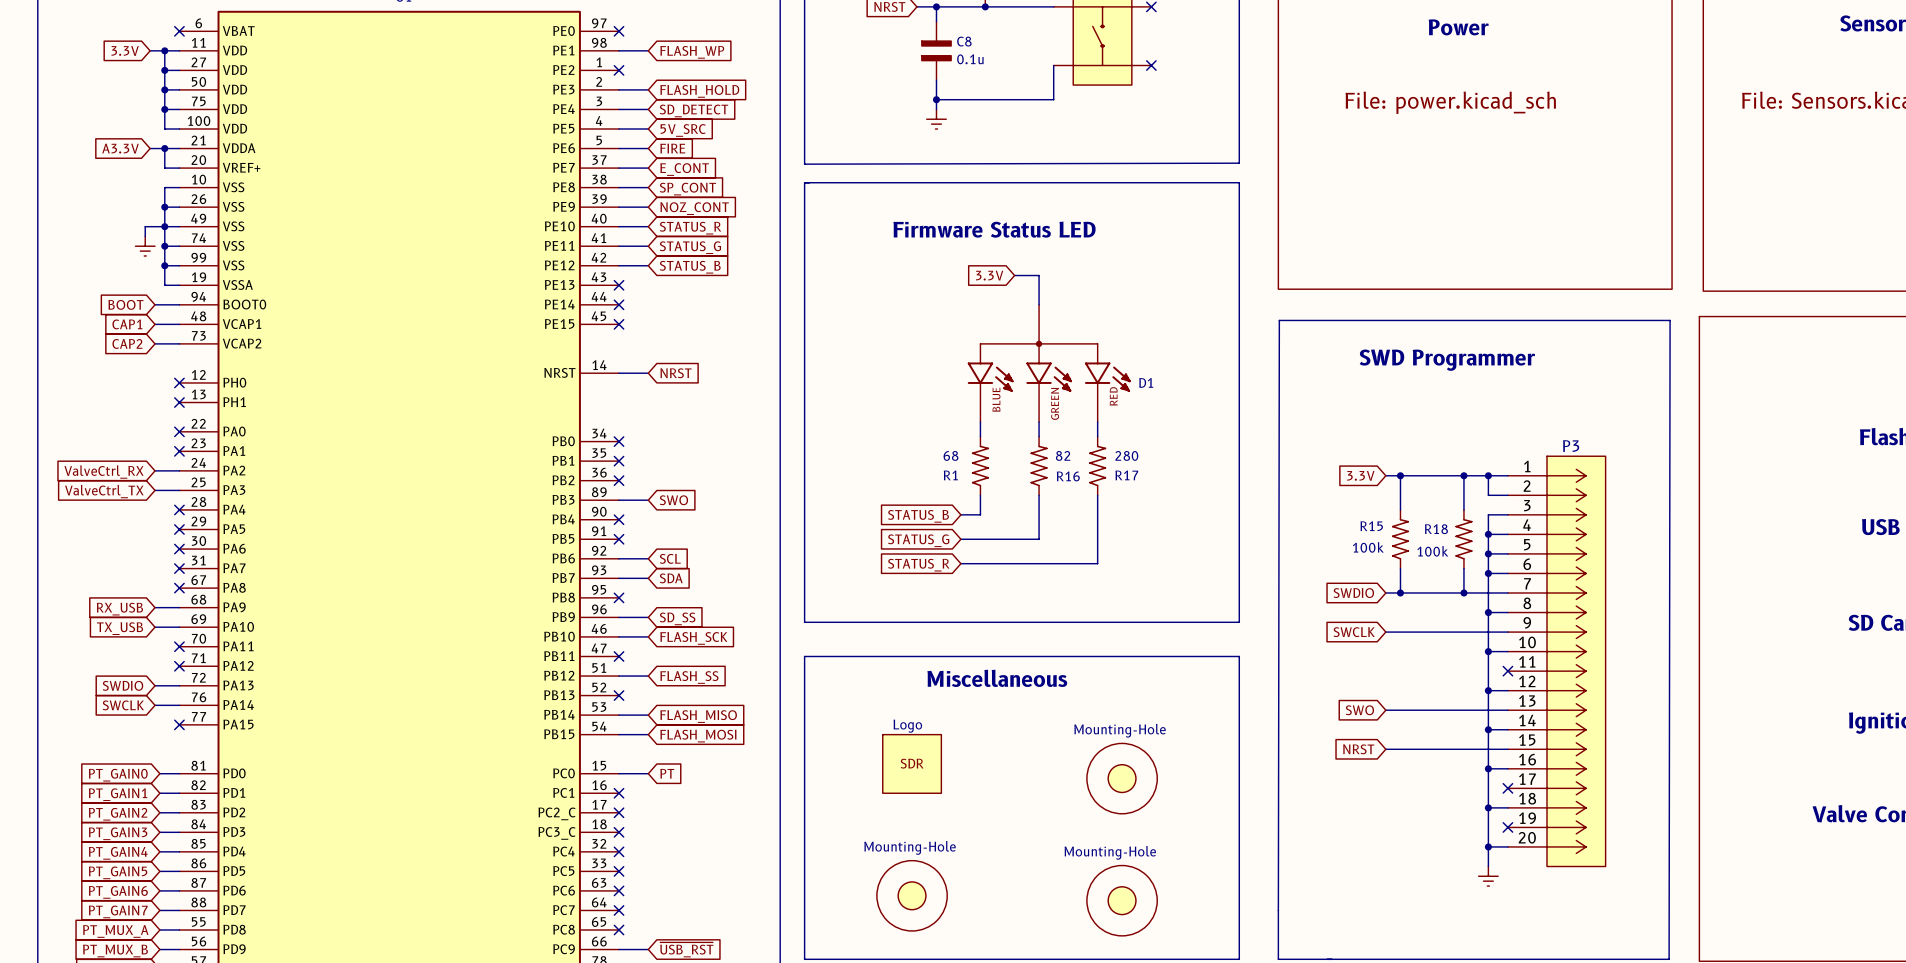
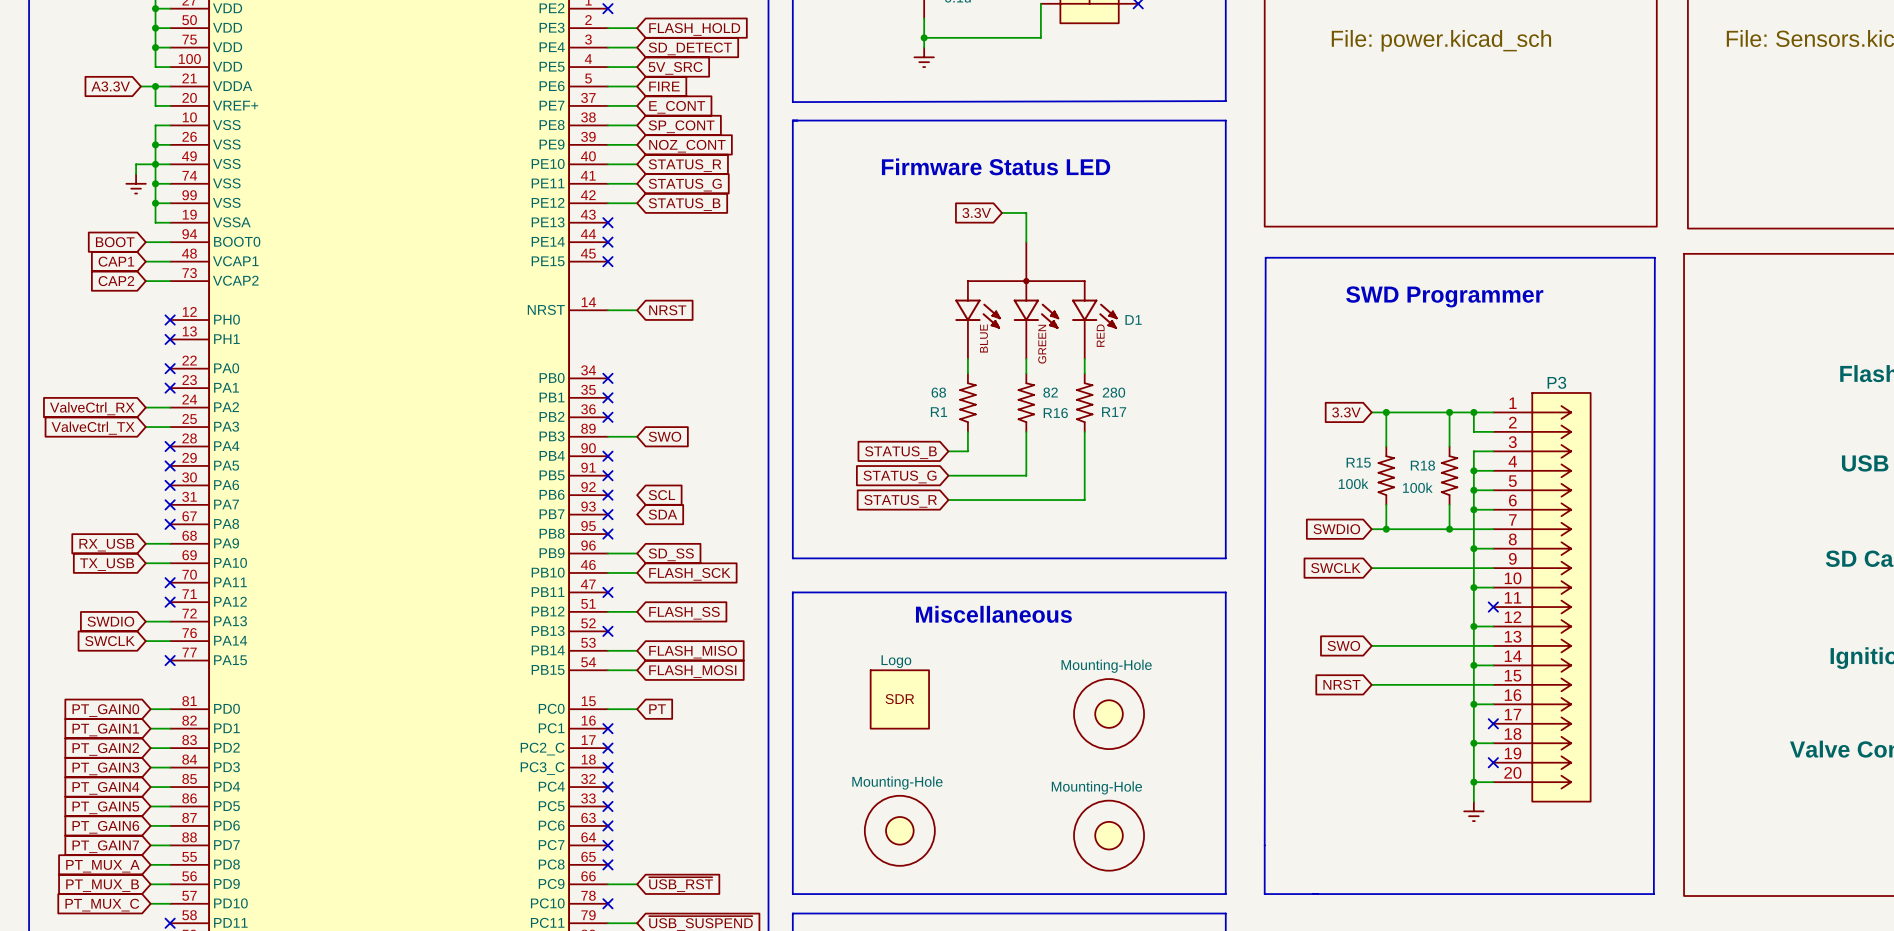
wire: (619, 558) (648, 558) -> none
no-connect mark: none -> (607, 495)
wire: (619, 578) (648, 578) -> none
no-connect mark: none -> (607, 514)

